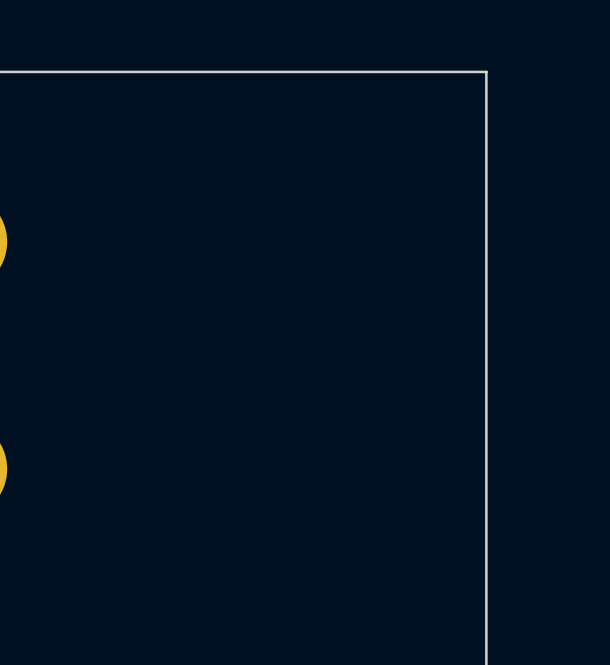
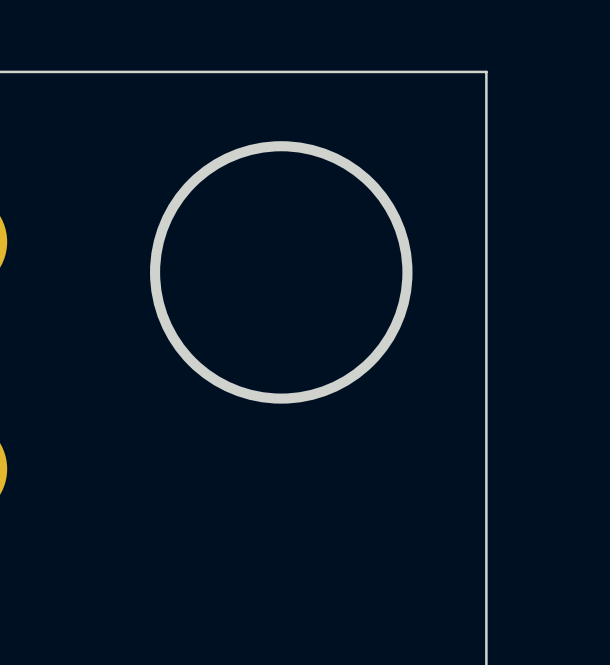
round board edge: none -> [150, 141, 413, 404]

